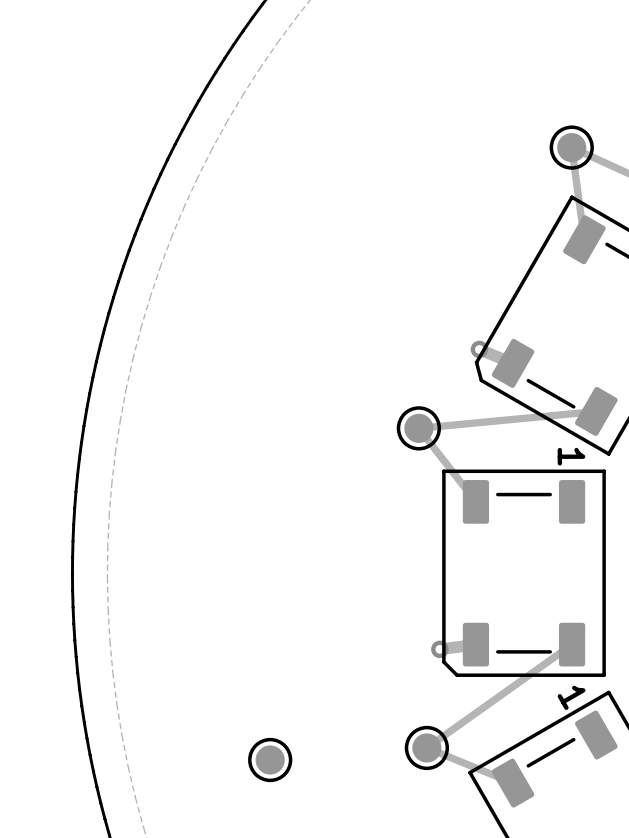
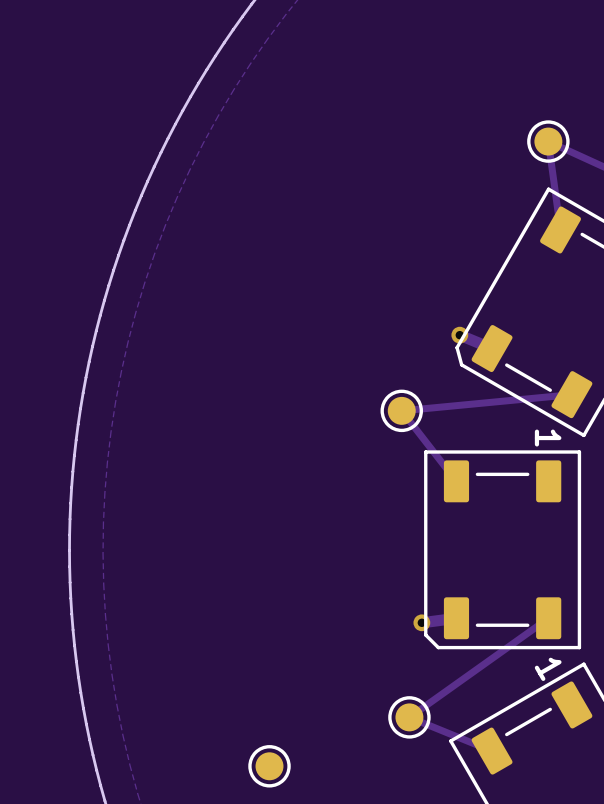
part position: (270, 760) -> (269, 766)

